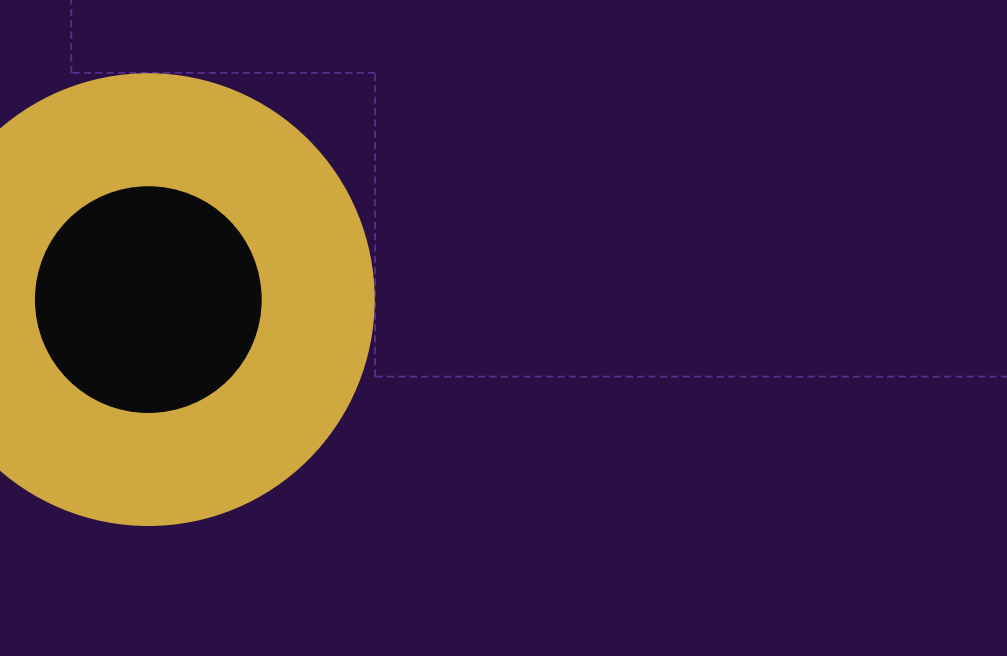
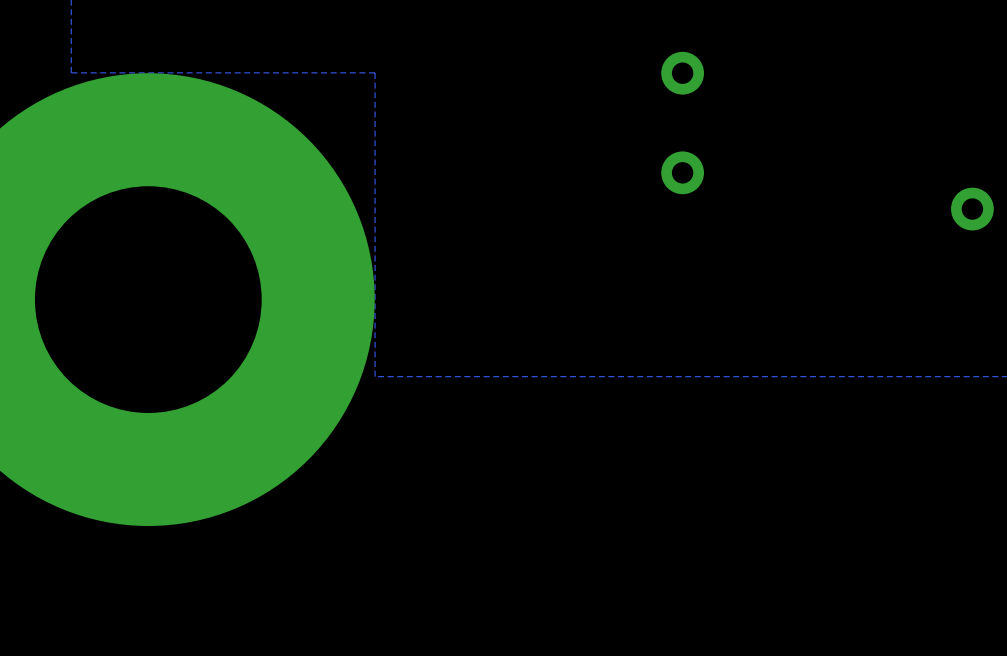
via: none -> (682, 73)
via: none -> (682, 172)
via: none -> (972, 209)

